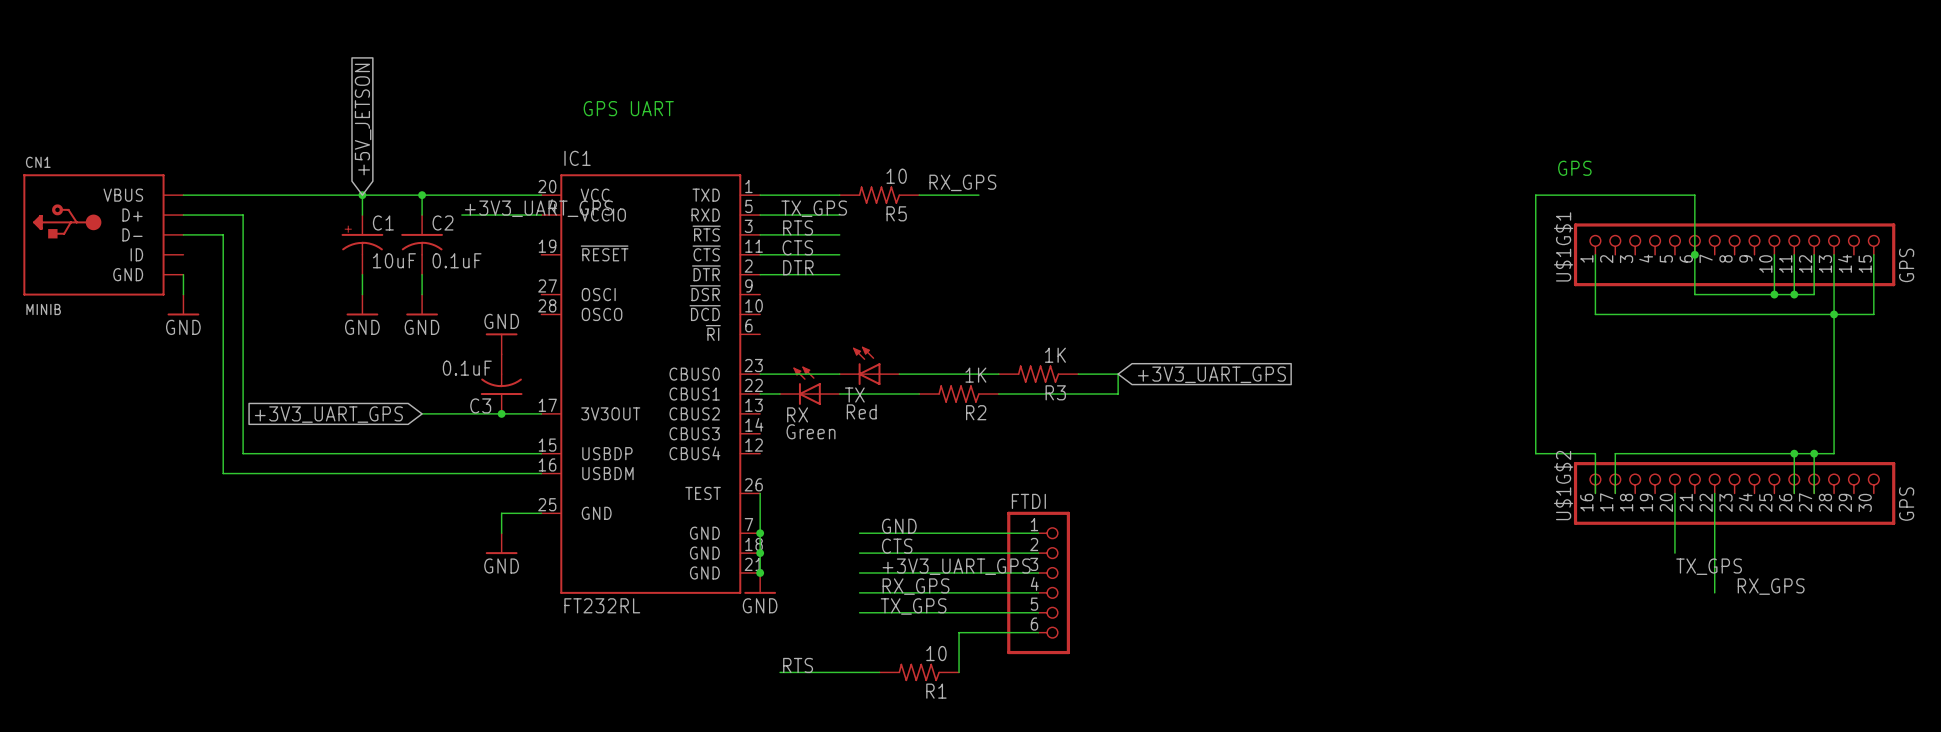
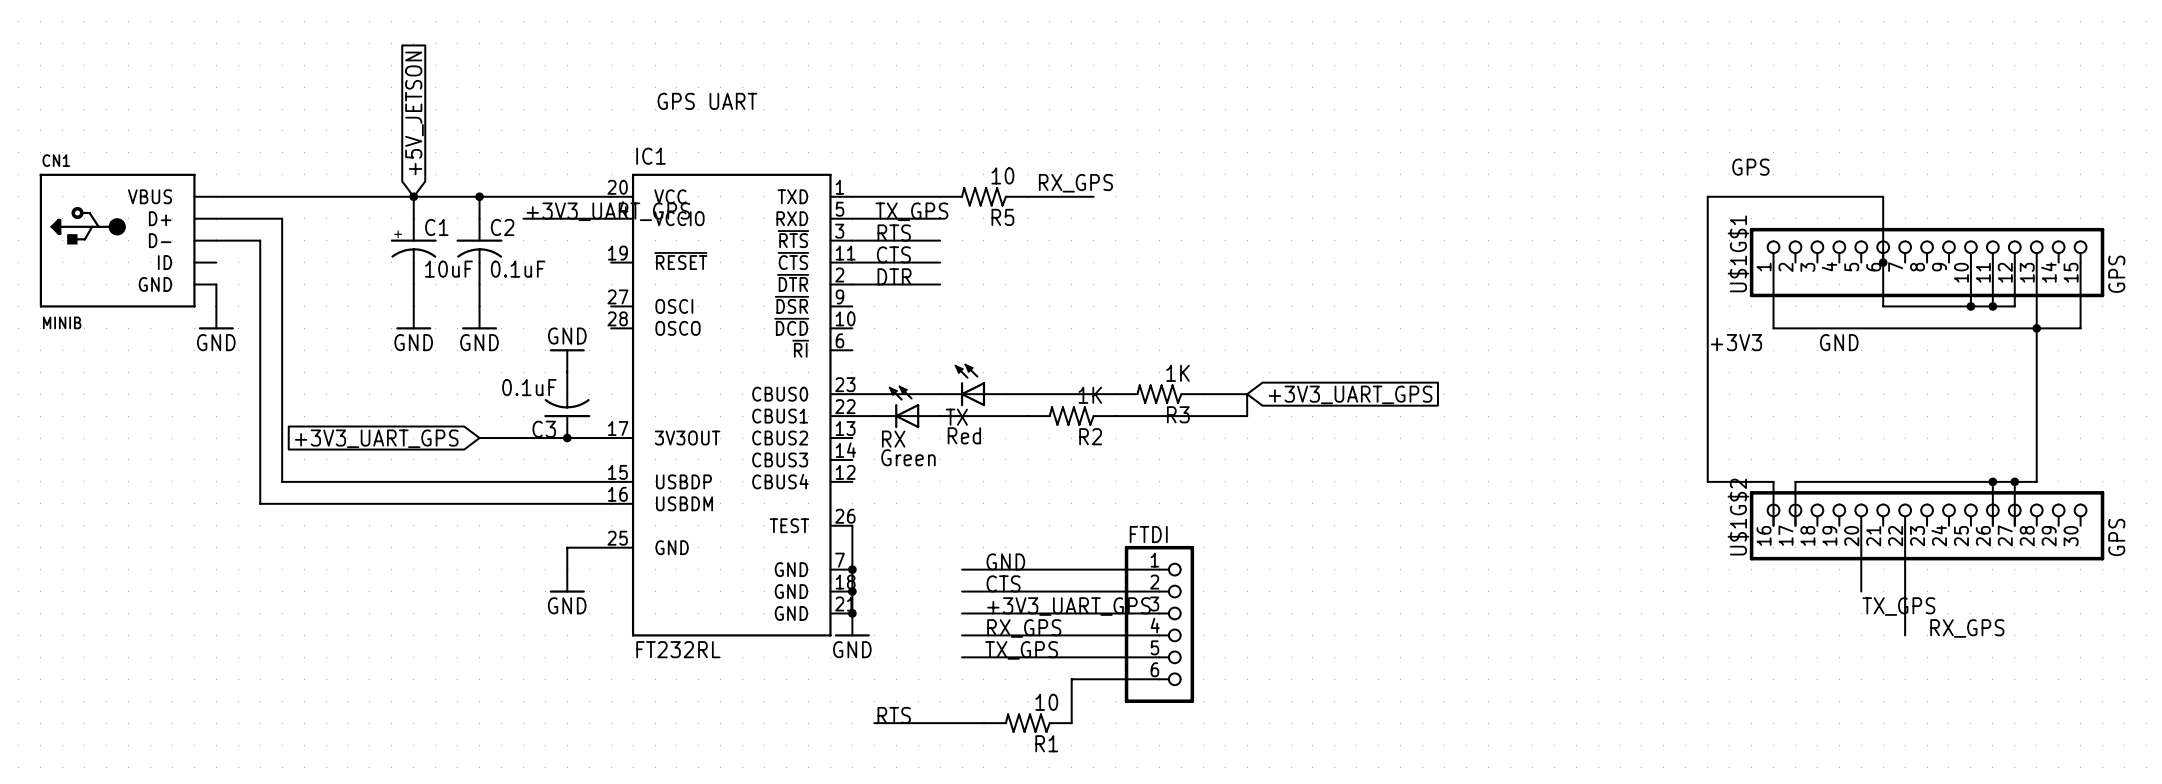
label: none -> +3V3 (1736, 342)
label: none -> GND (1839, 342)

